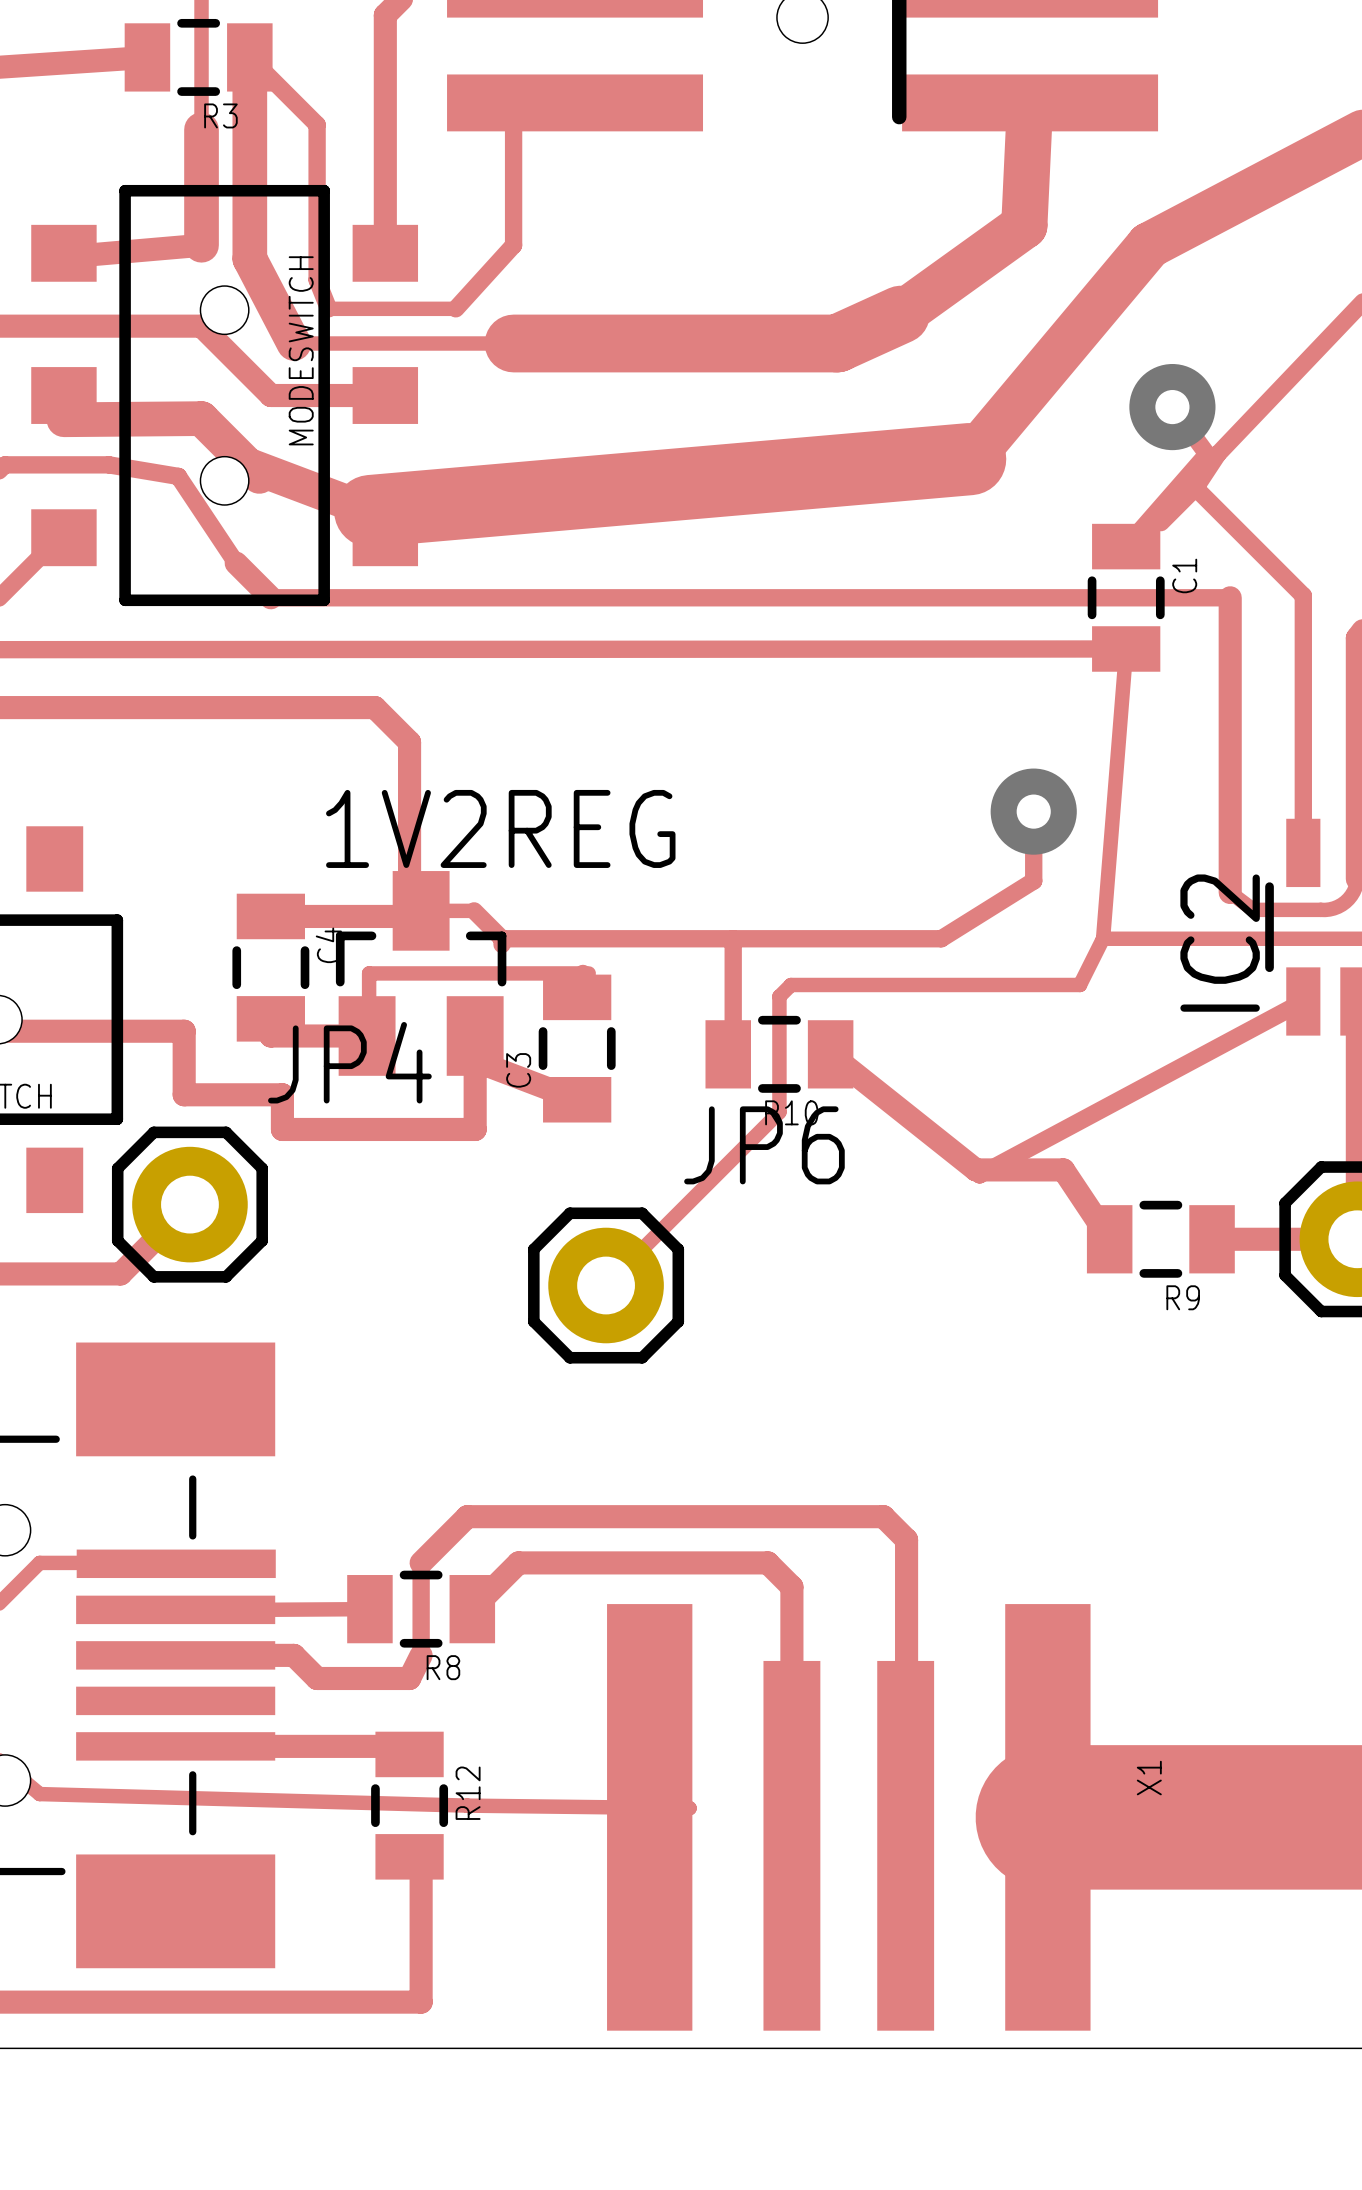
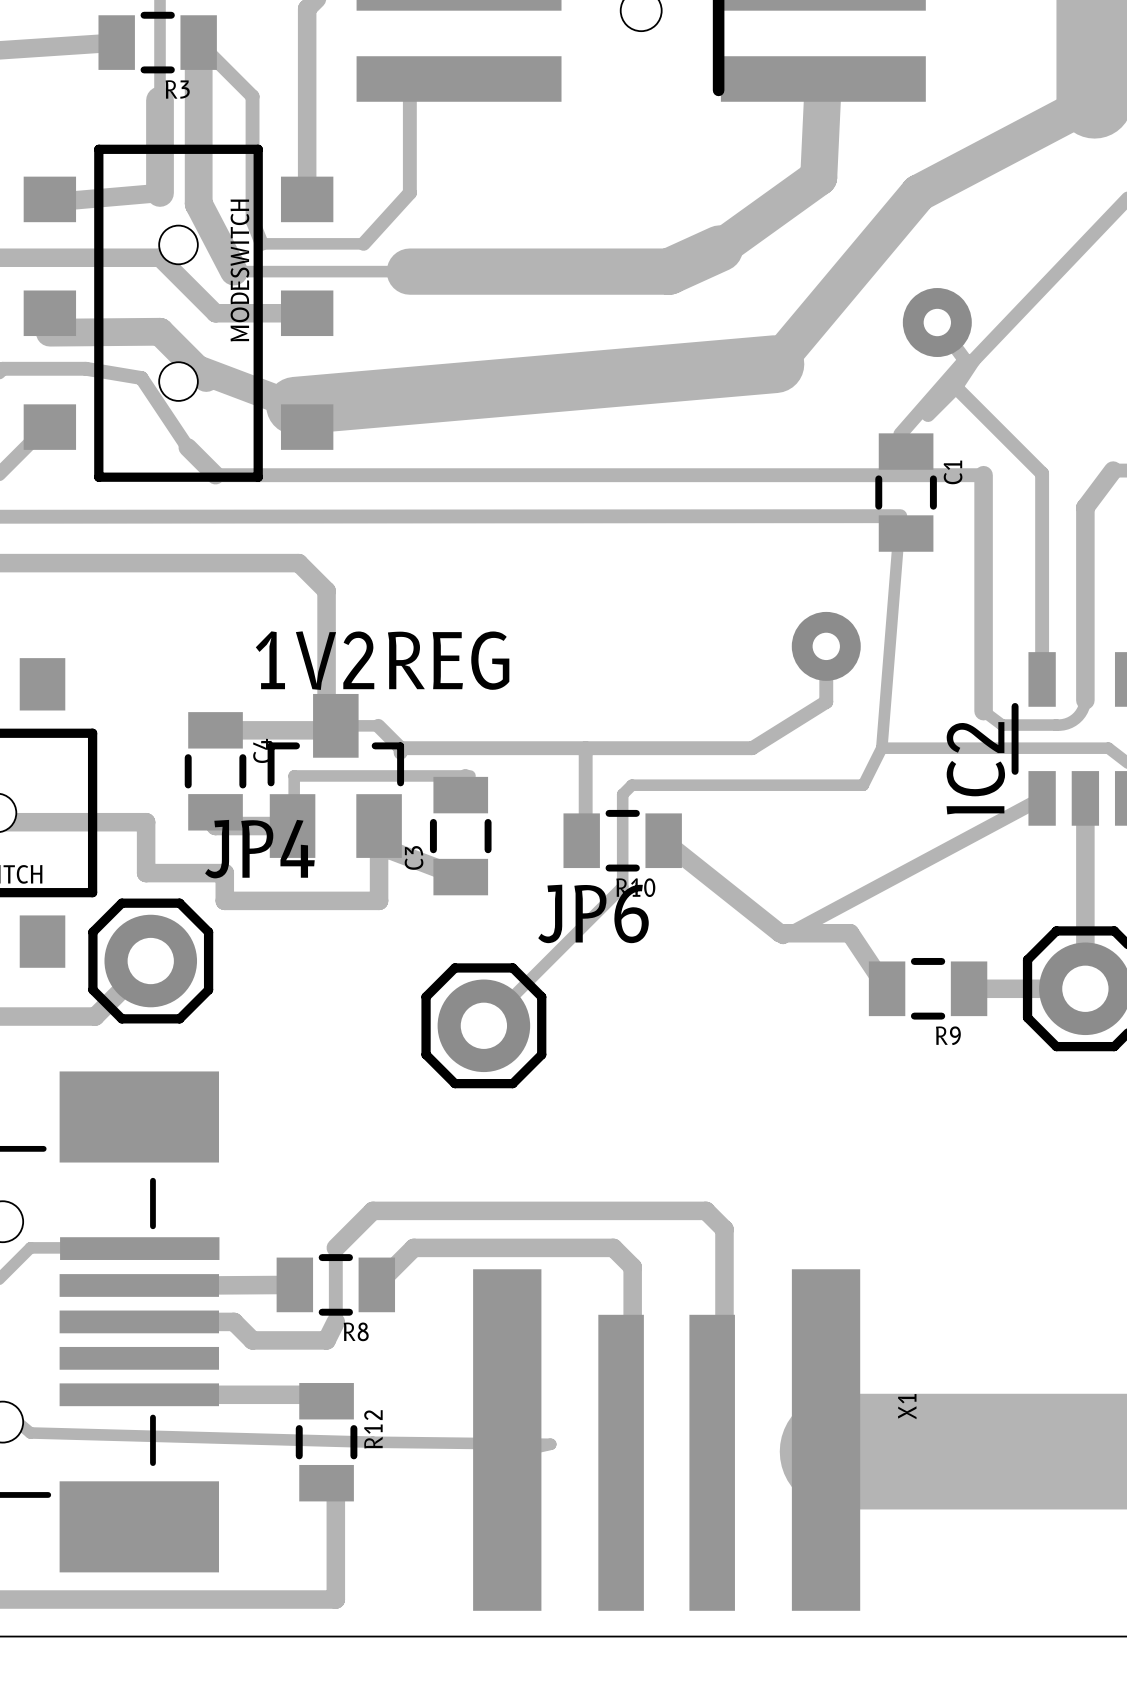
C1 position: (1126, 597) -> (906, 492)
track width: thin (369, 1609) (253, 1609) -> thick (294, 1284) (201, 1285)
X1 position: (848, 1817) -> (666, 1440)

